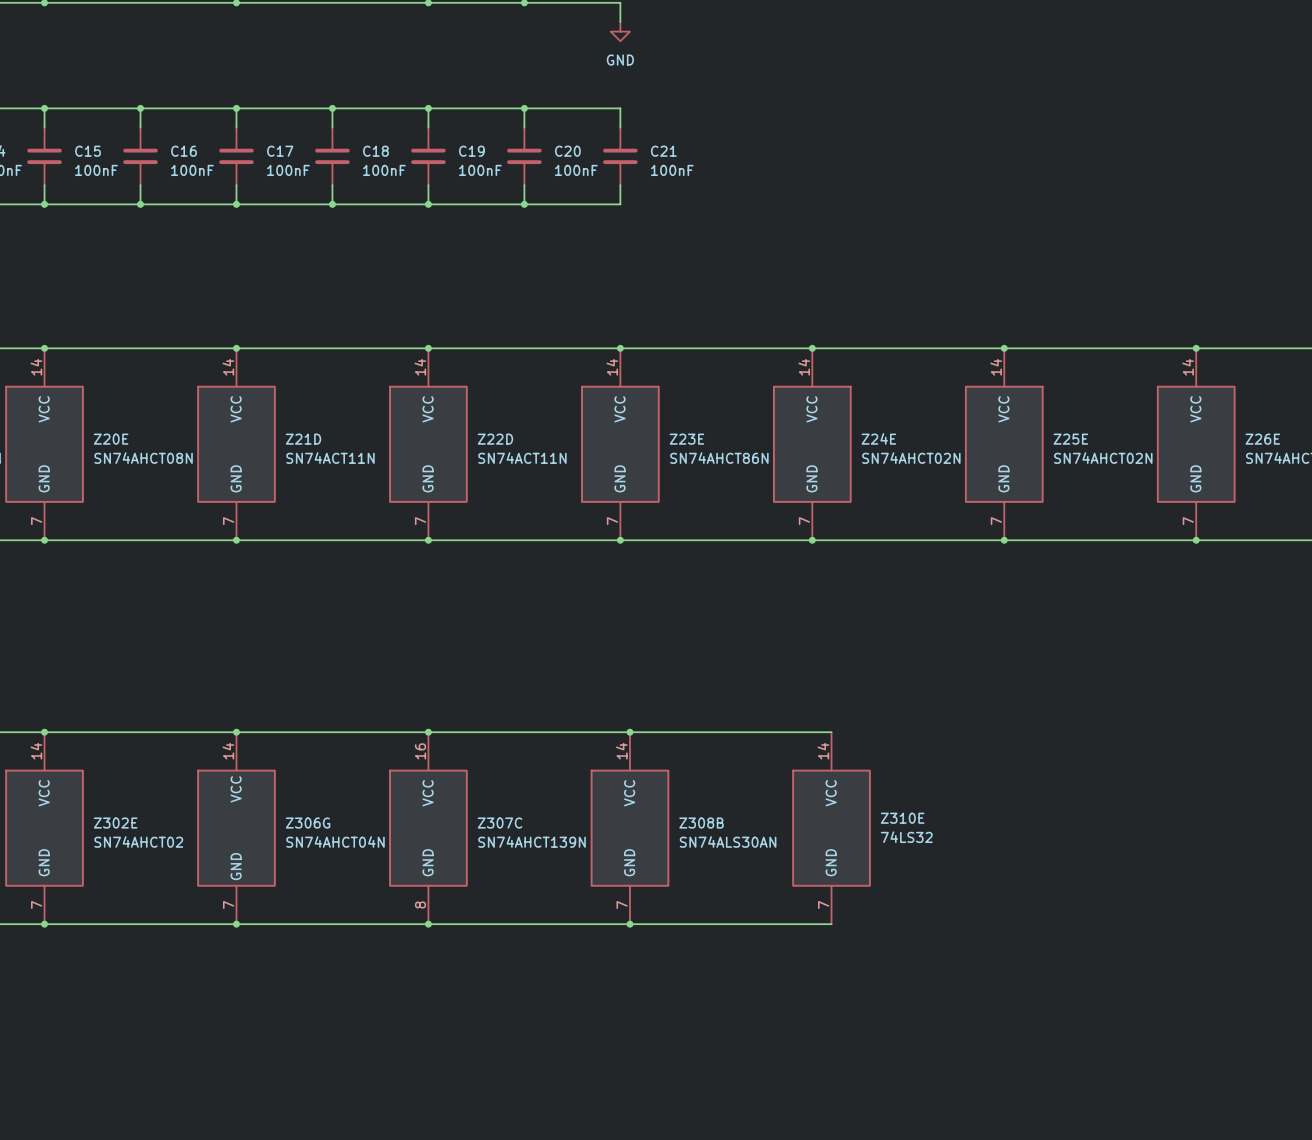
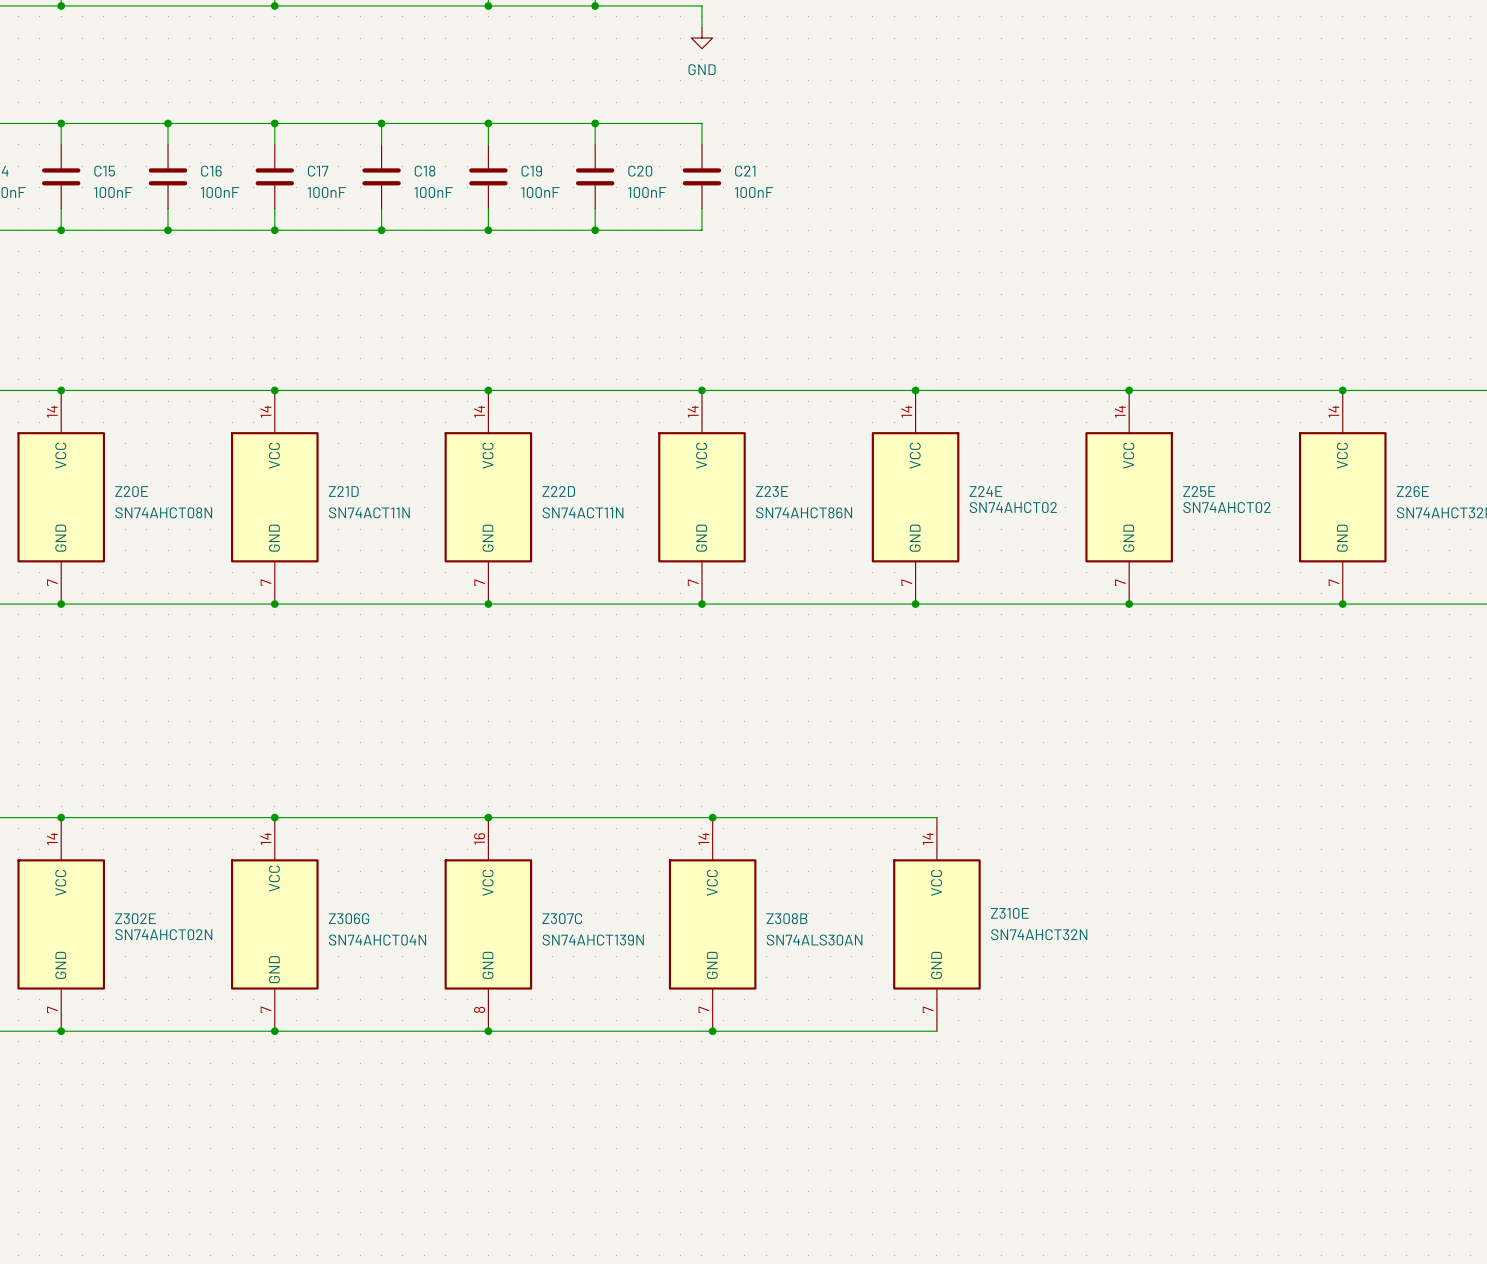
Z24E value: SN74AHCT02N (911, 458) -> SN74AHCT02 (1013, 507)
Z25E value: SN74AHCT02N (1103, 458) -> SN74AHCT02 (1226, 507)
Z310E value: 74LS32 (906, 837) -> SN74AHCT32N (1039, 934)
Z302E value: SN74AHCT02 (138, 842) -> SN74AHCT02N (163, 934)

